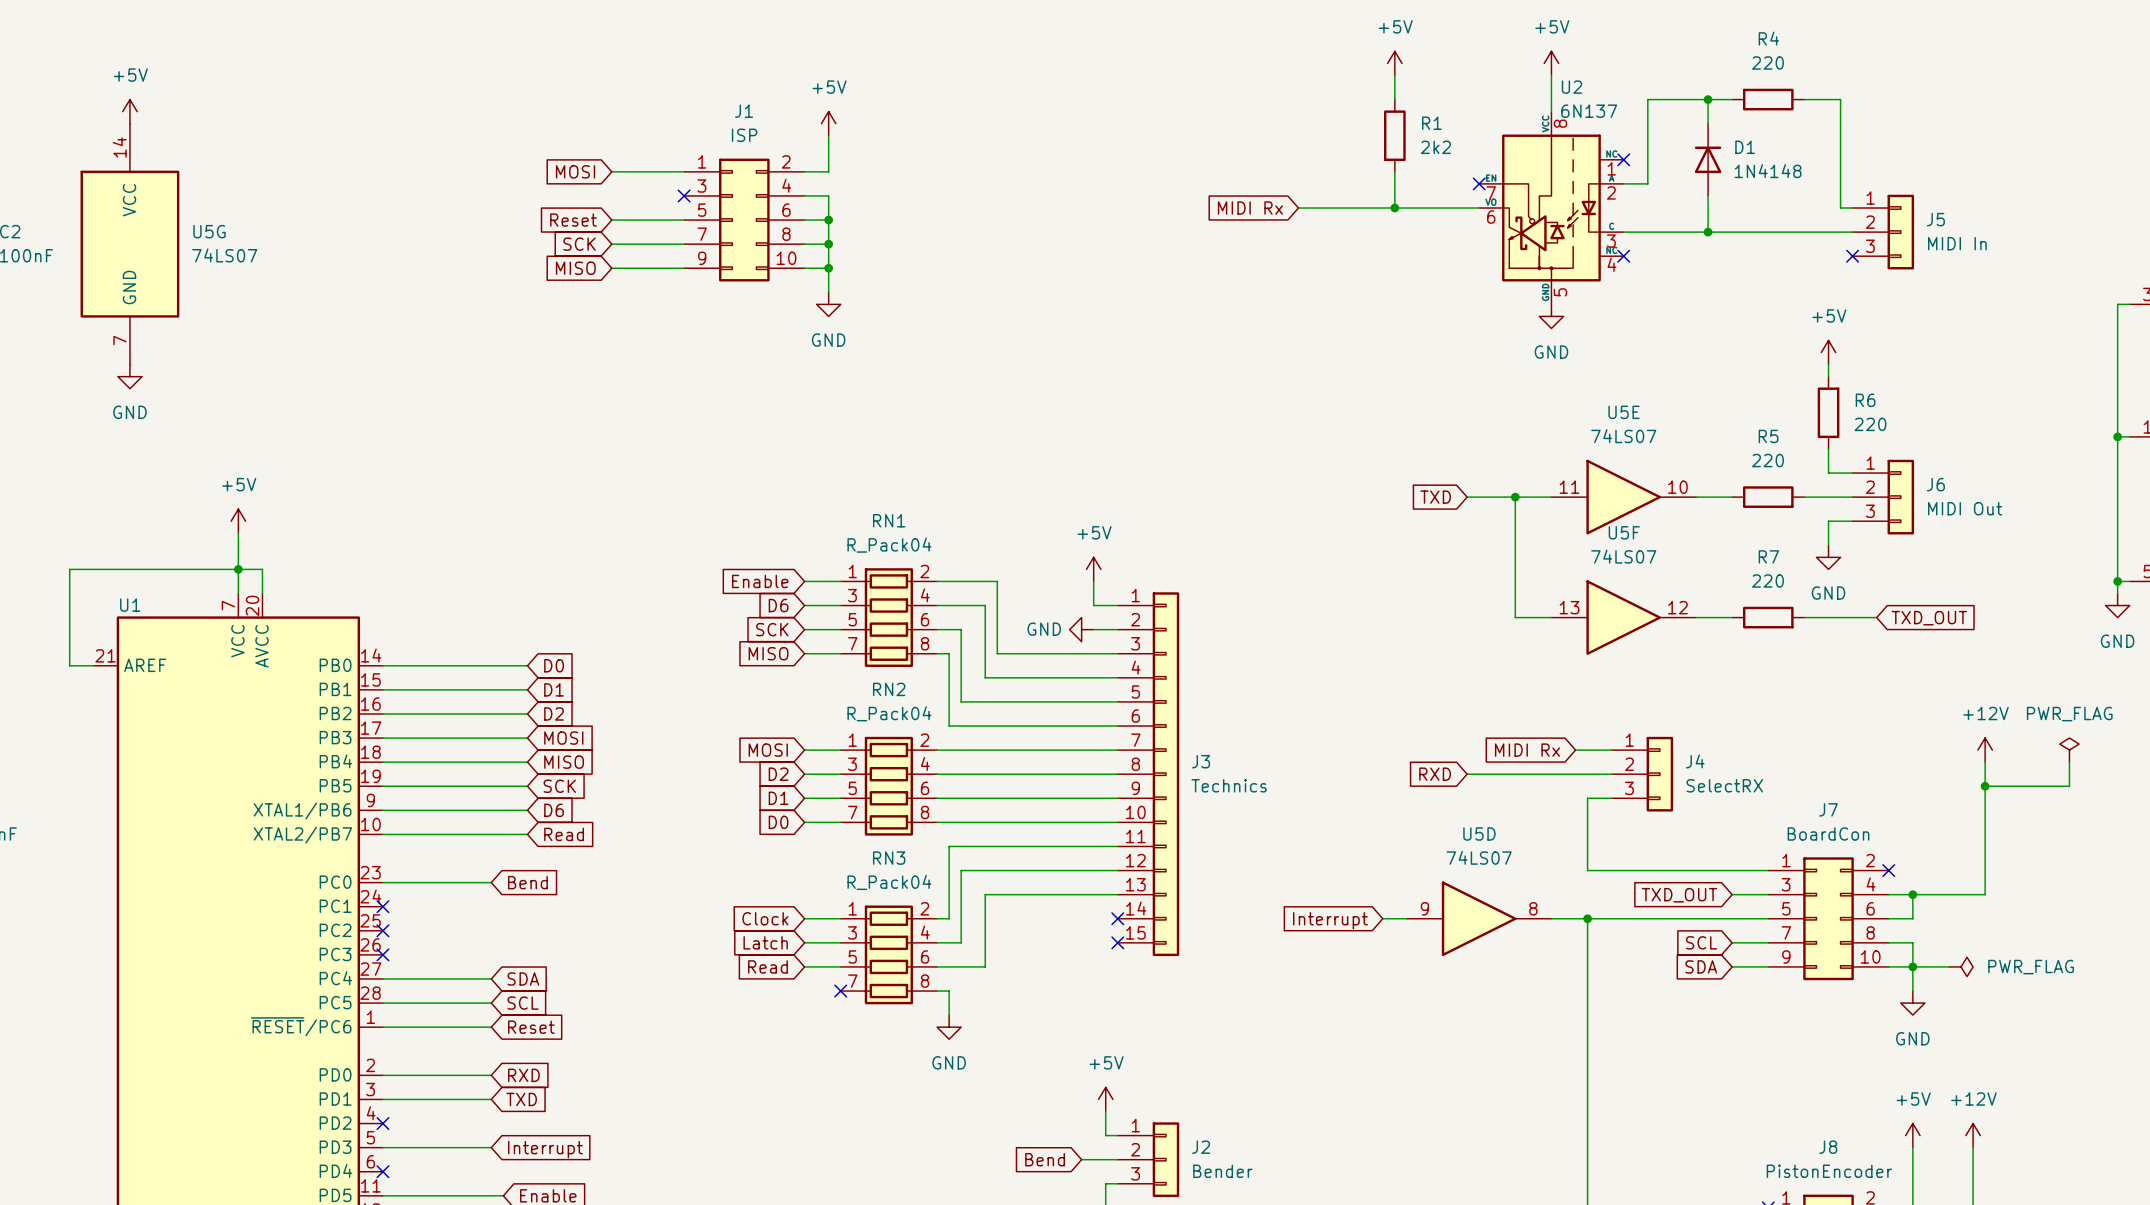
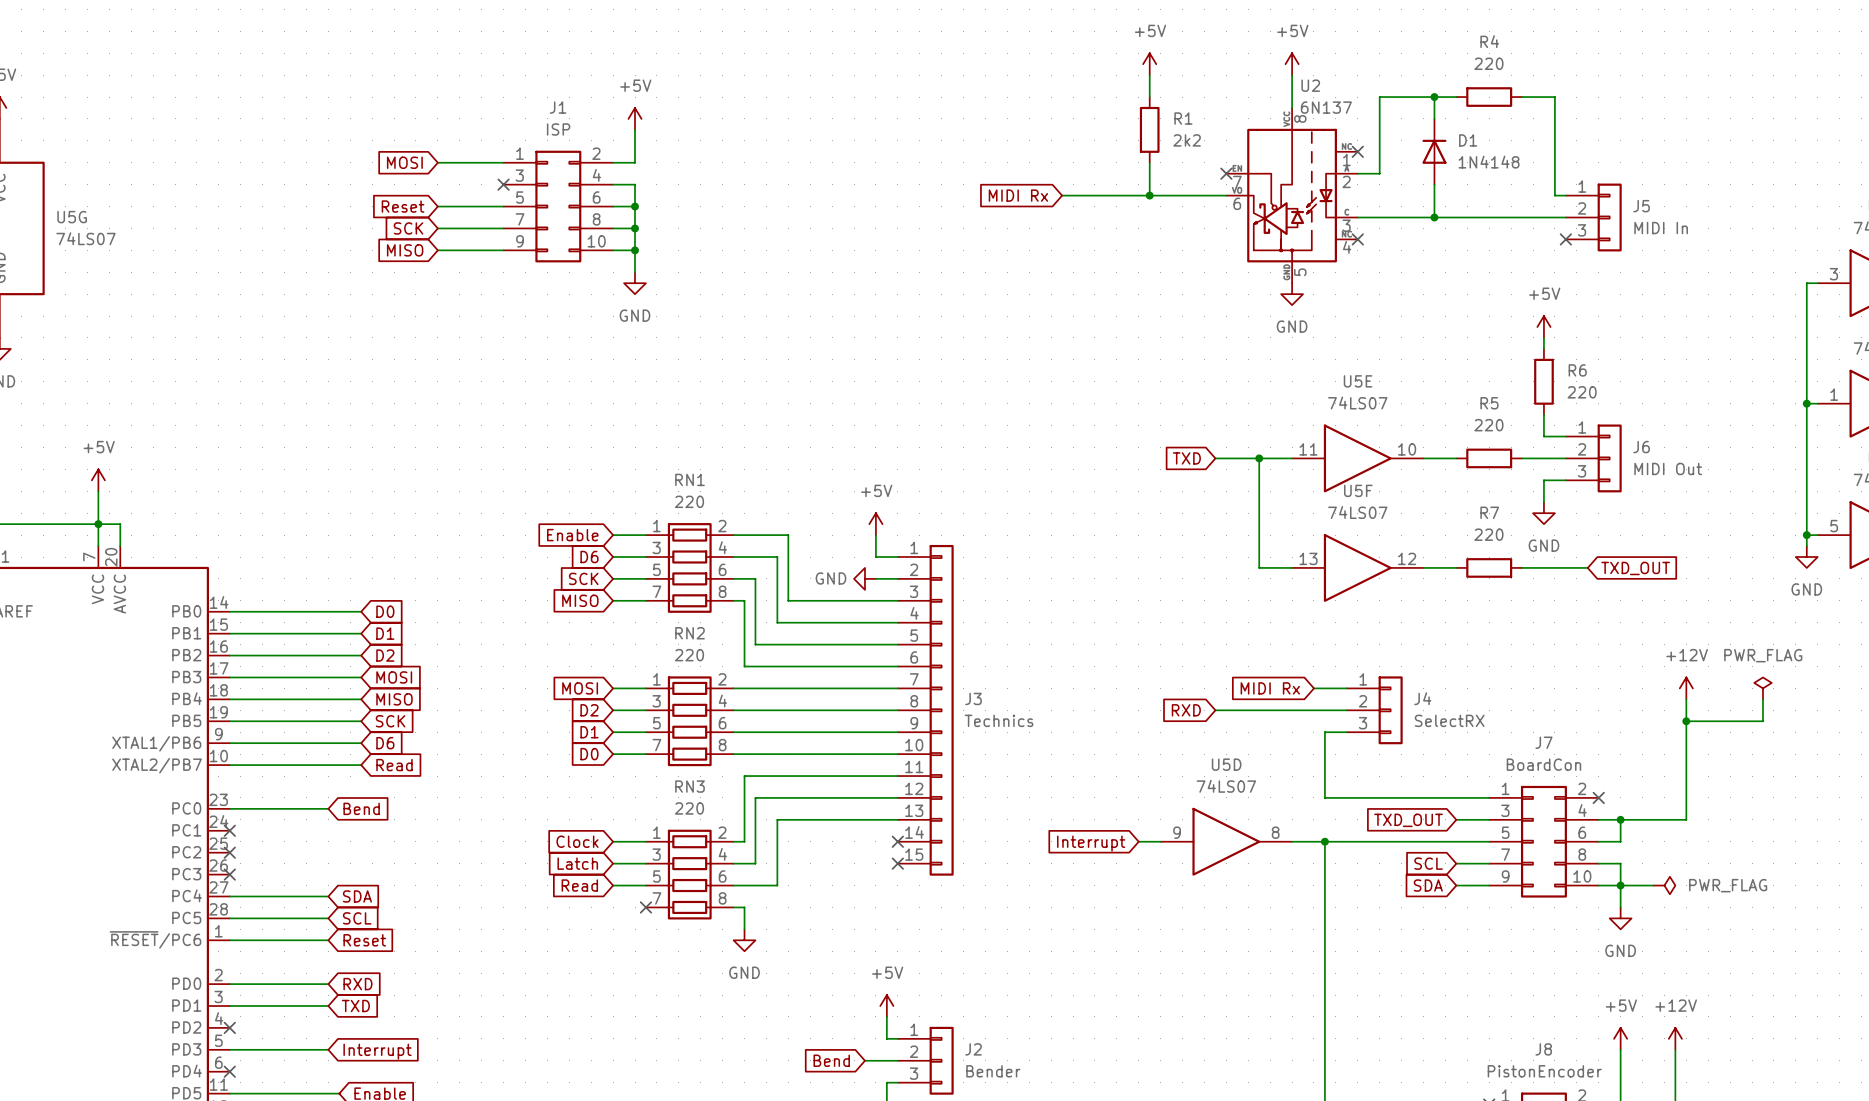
RN1 value: R_Pack04 (889, 545) -> 220 (689, 501)
RN2 value: R_Pack04 (889, 713) -> 220 (689, 655)
RN3 value: R_Pack04 (889, 882) -> 220 (689, 808)

